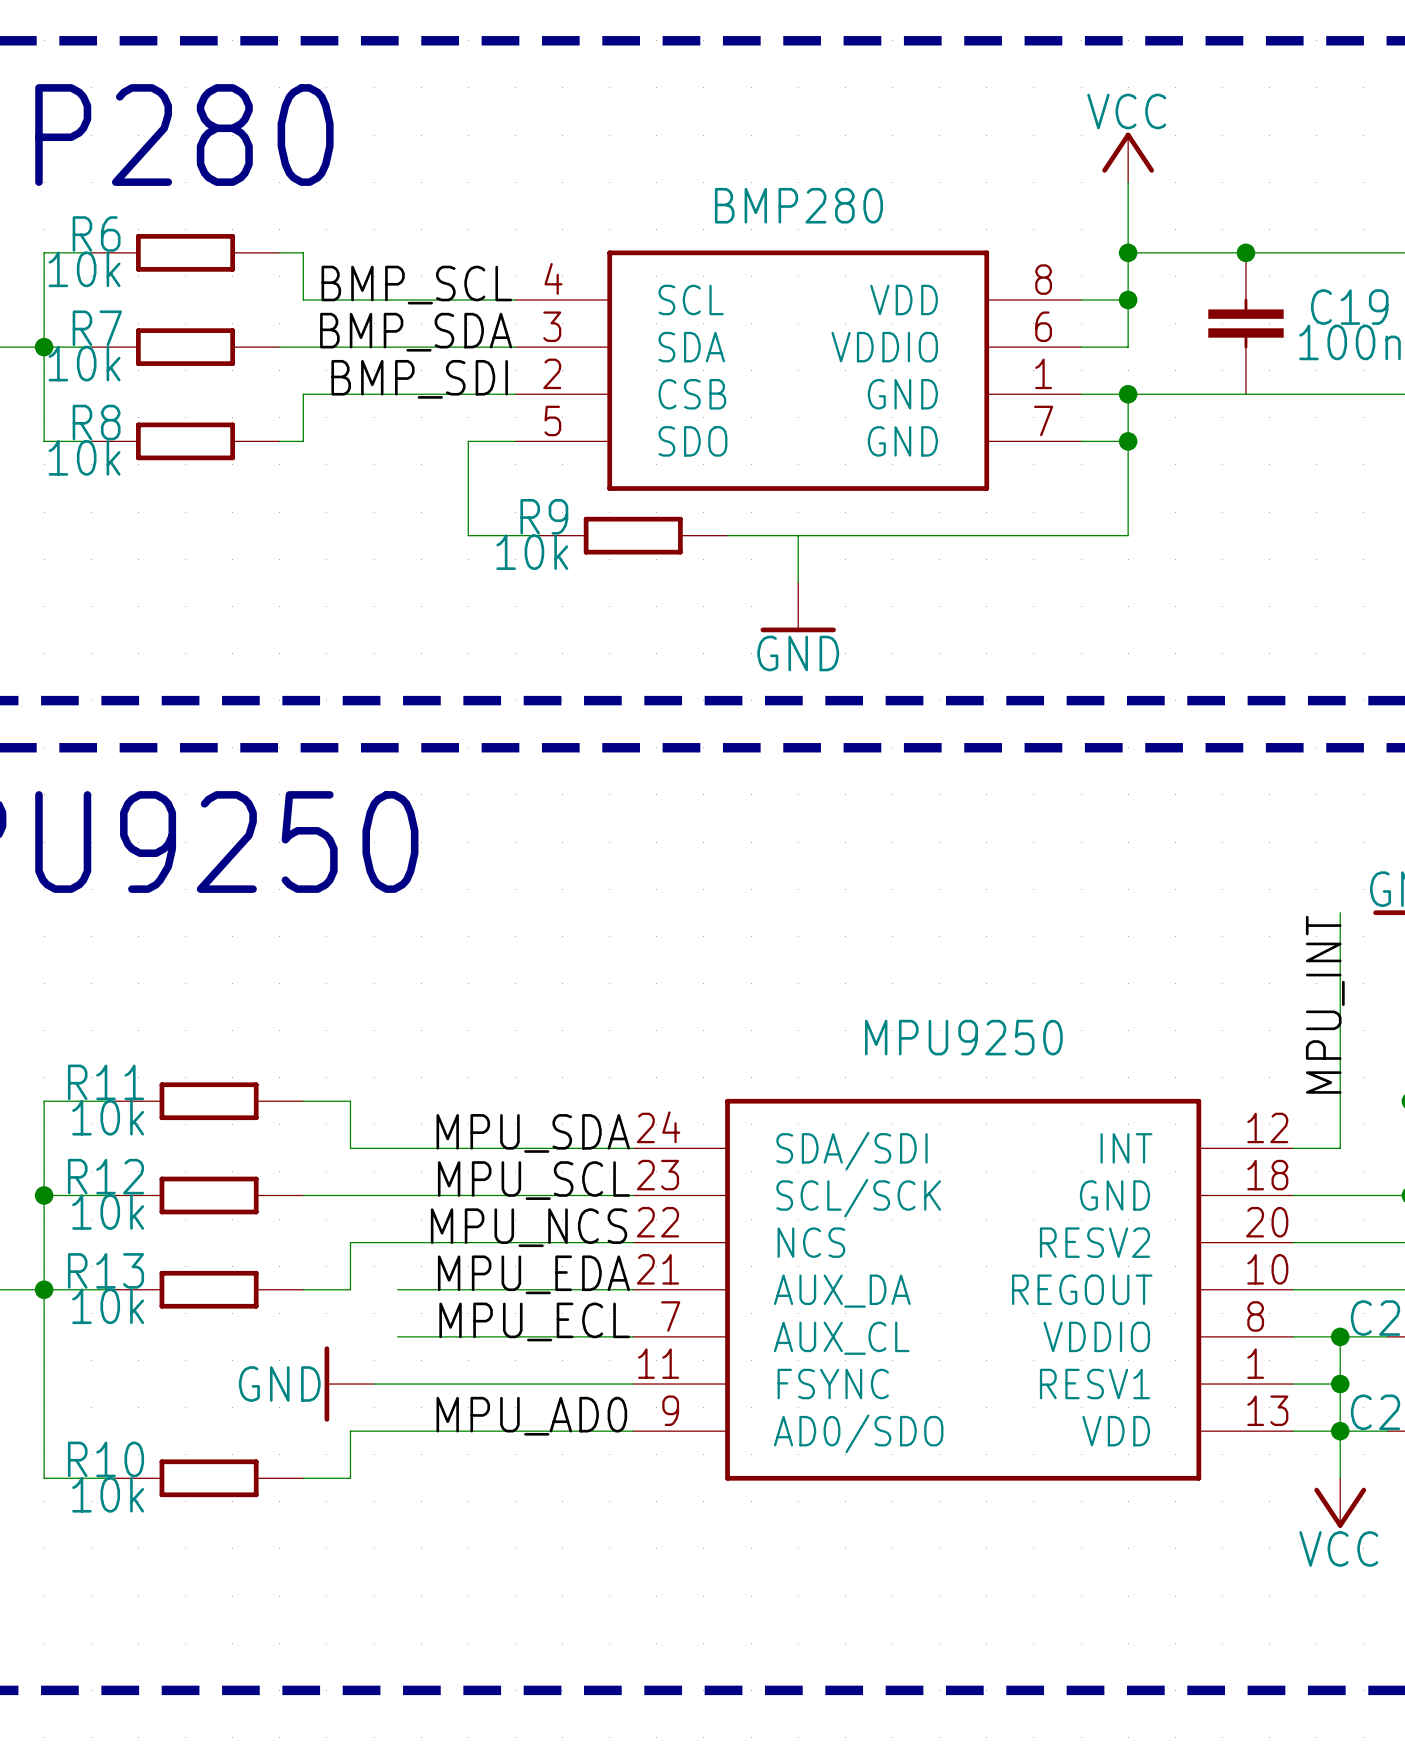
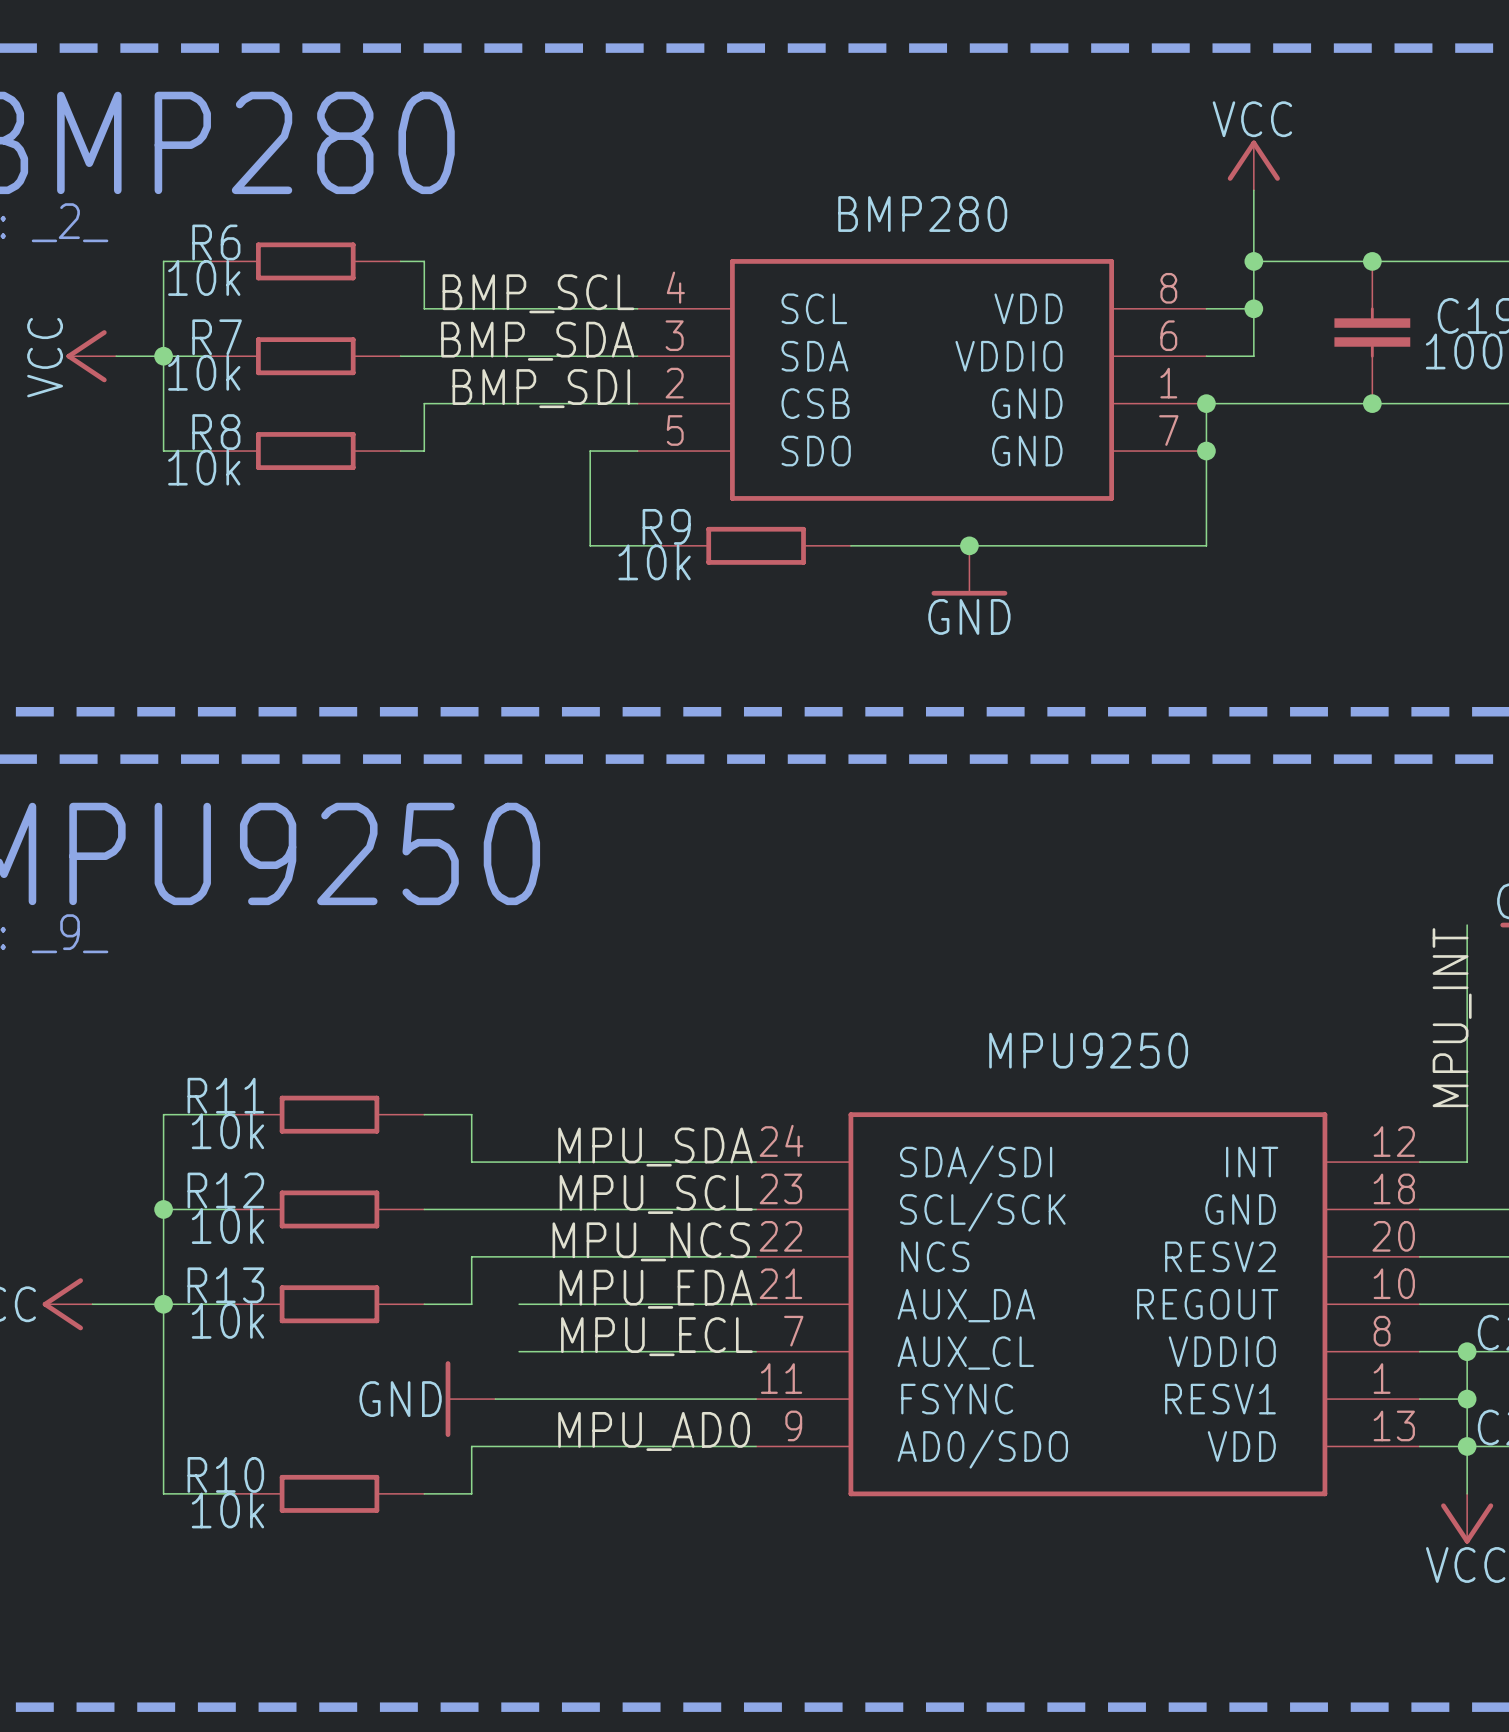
junction: none -> (1206, 403)
wire: (1128, 394) (1128, 535) (1081, 535) -> (1206, 403) (1206, 545)
junction: (1128, 394) -> none
junction: none -> (1372, 403)
wire: (1081, 441) (1128, 441) -> none
junction: none -> (1206, 451)
junction: (1128, 441) -> none
wire: (798, 535) (798, 582) -> none
junction: none -> (969, 545)
power symbol position: GND (798, 607) -> GND (969, 570)

